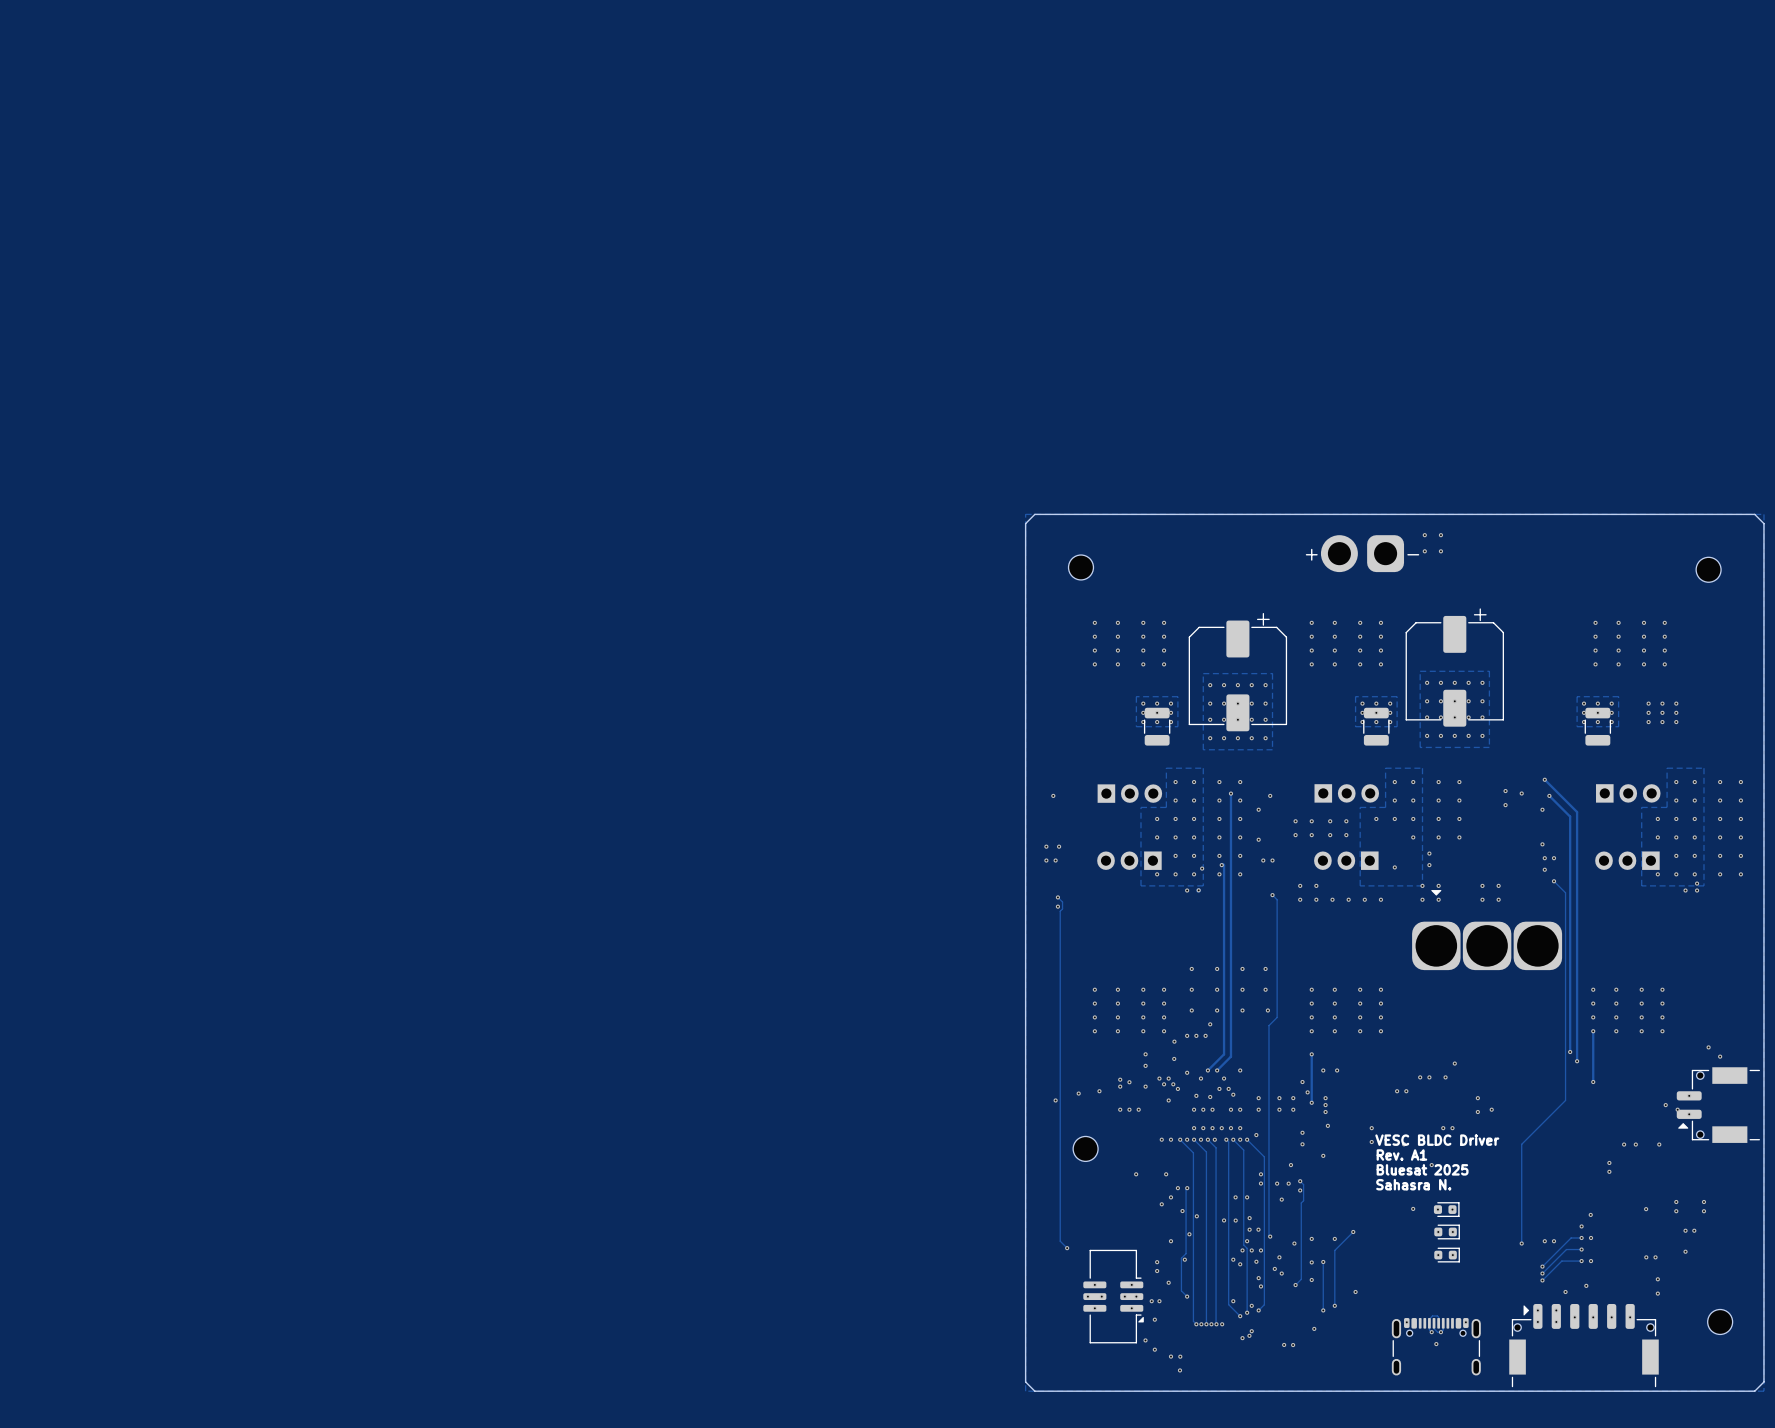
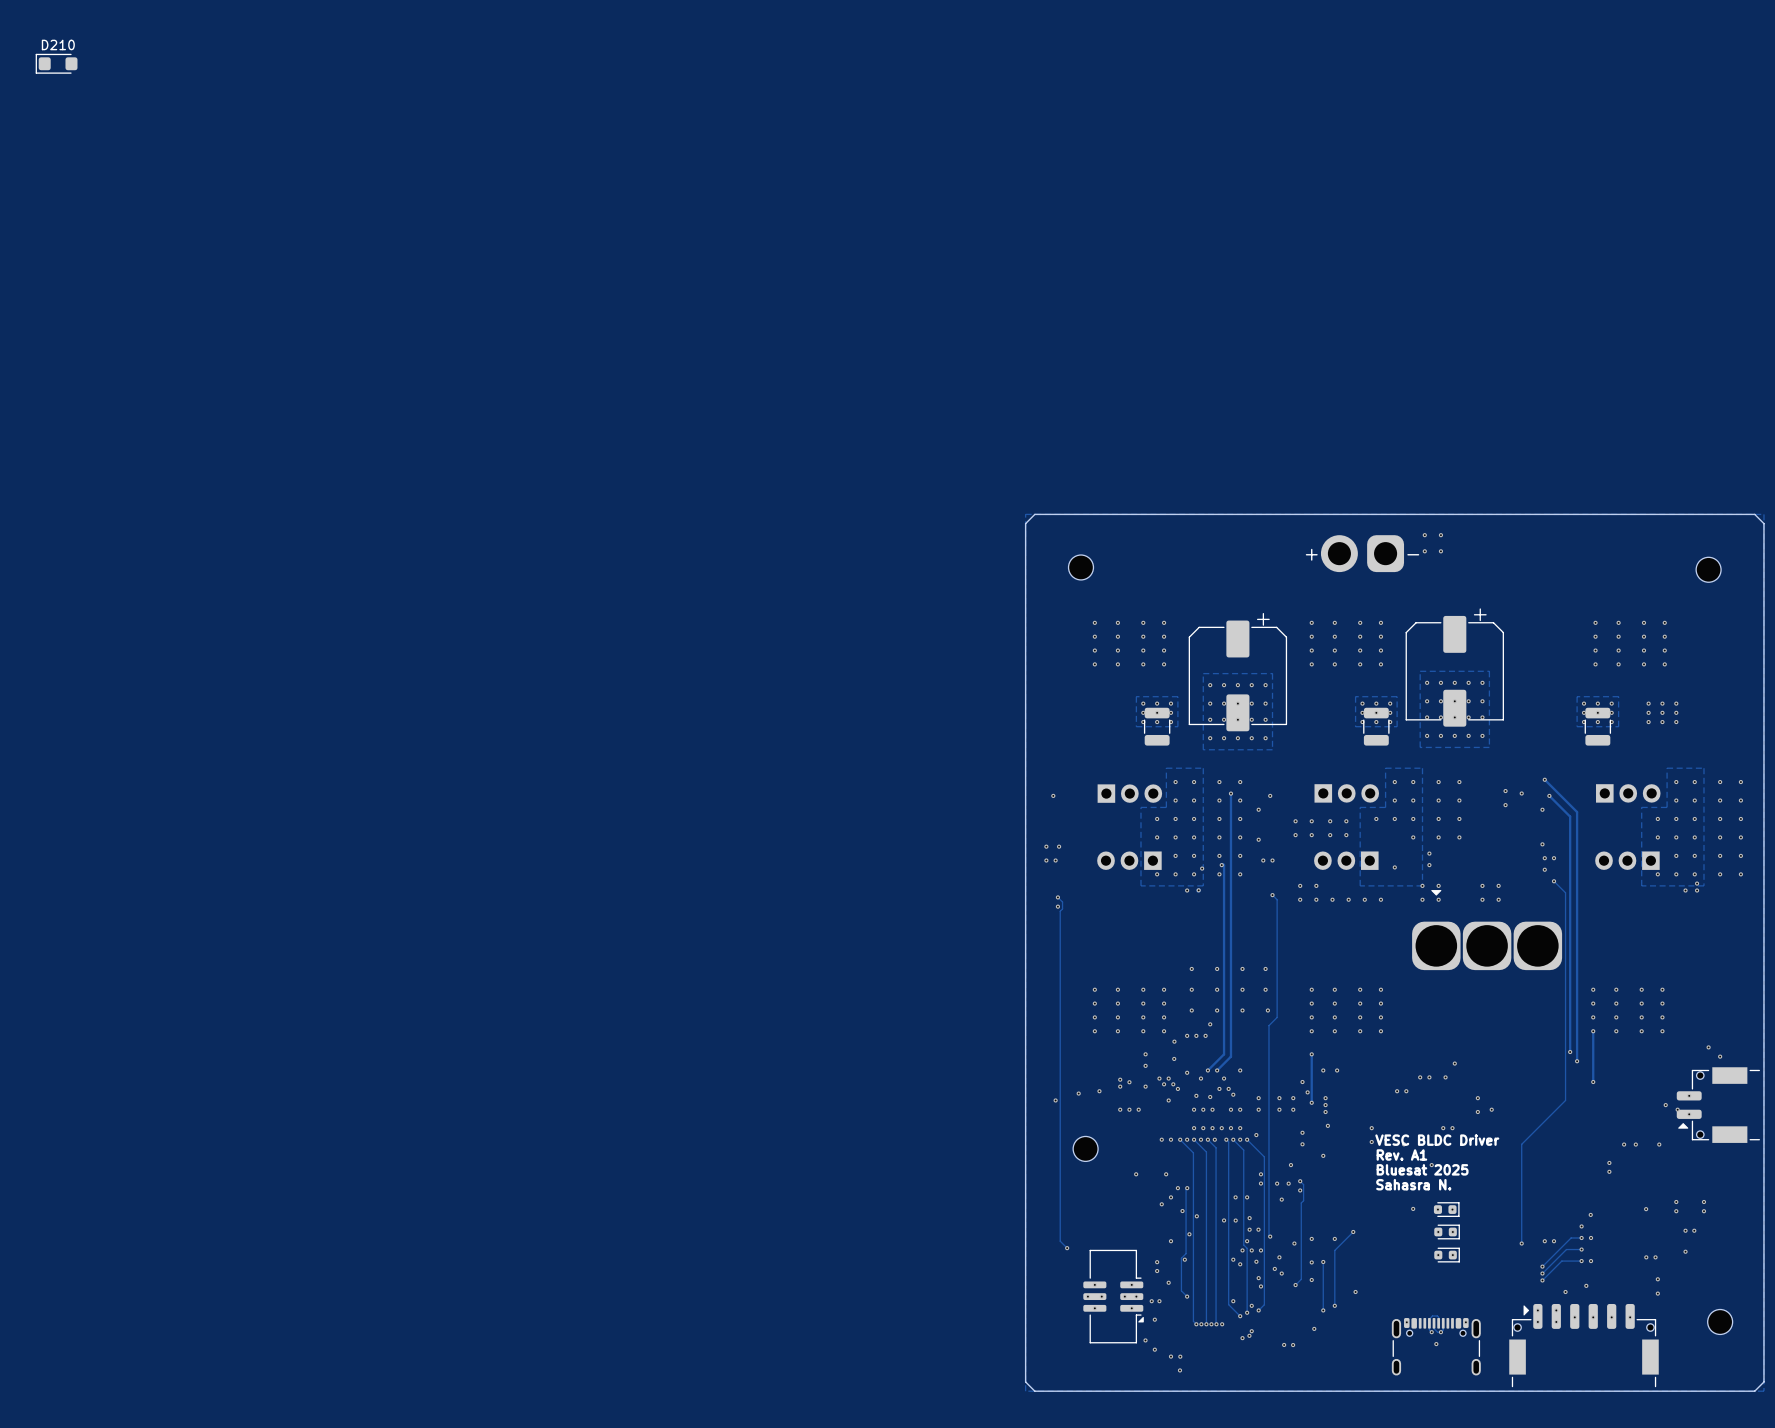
D210: none -> (56, 63)

